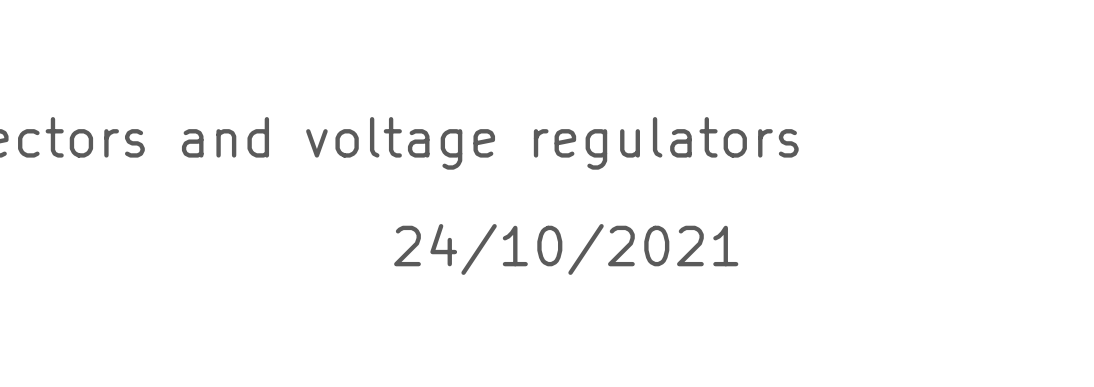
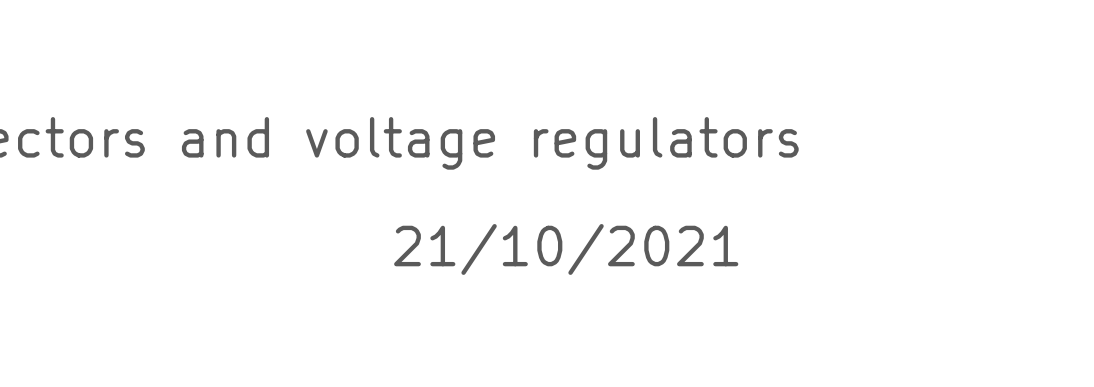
text: 24/10/2021 (566, 249) -> 21/10/2021 (566, 249)

